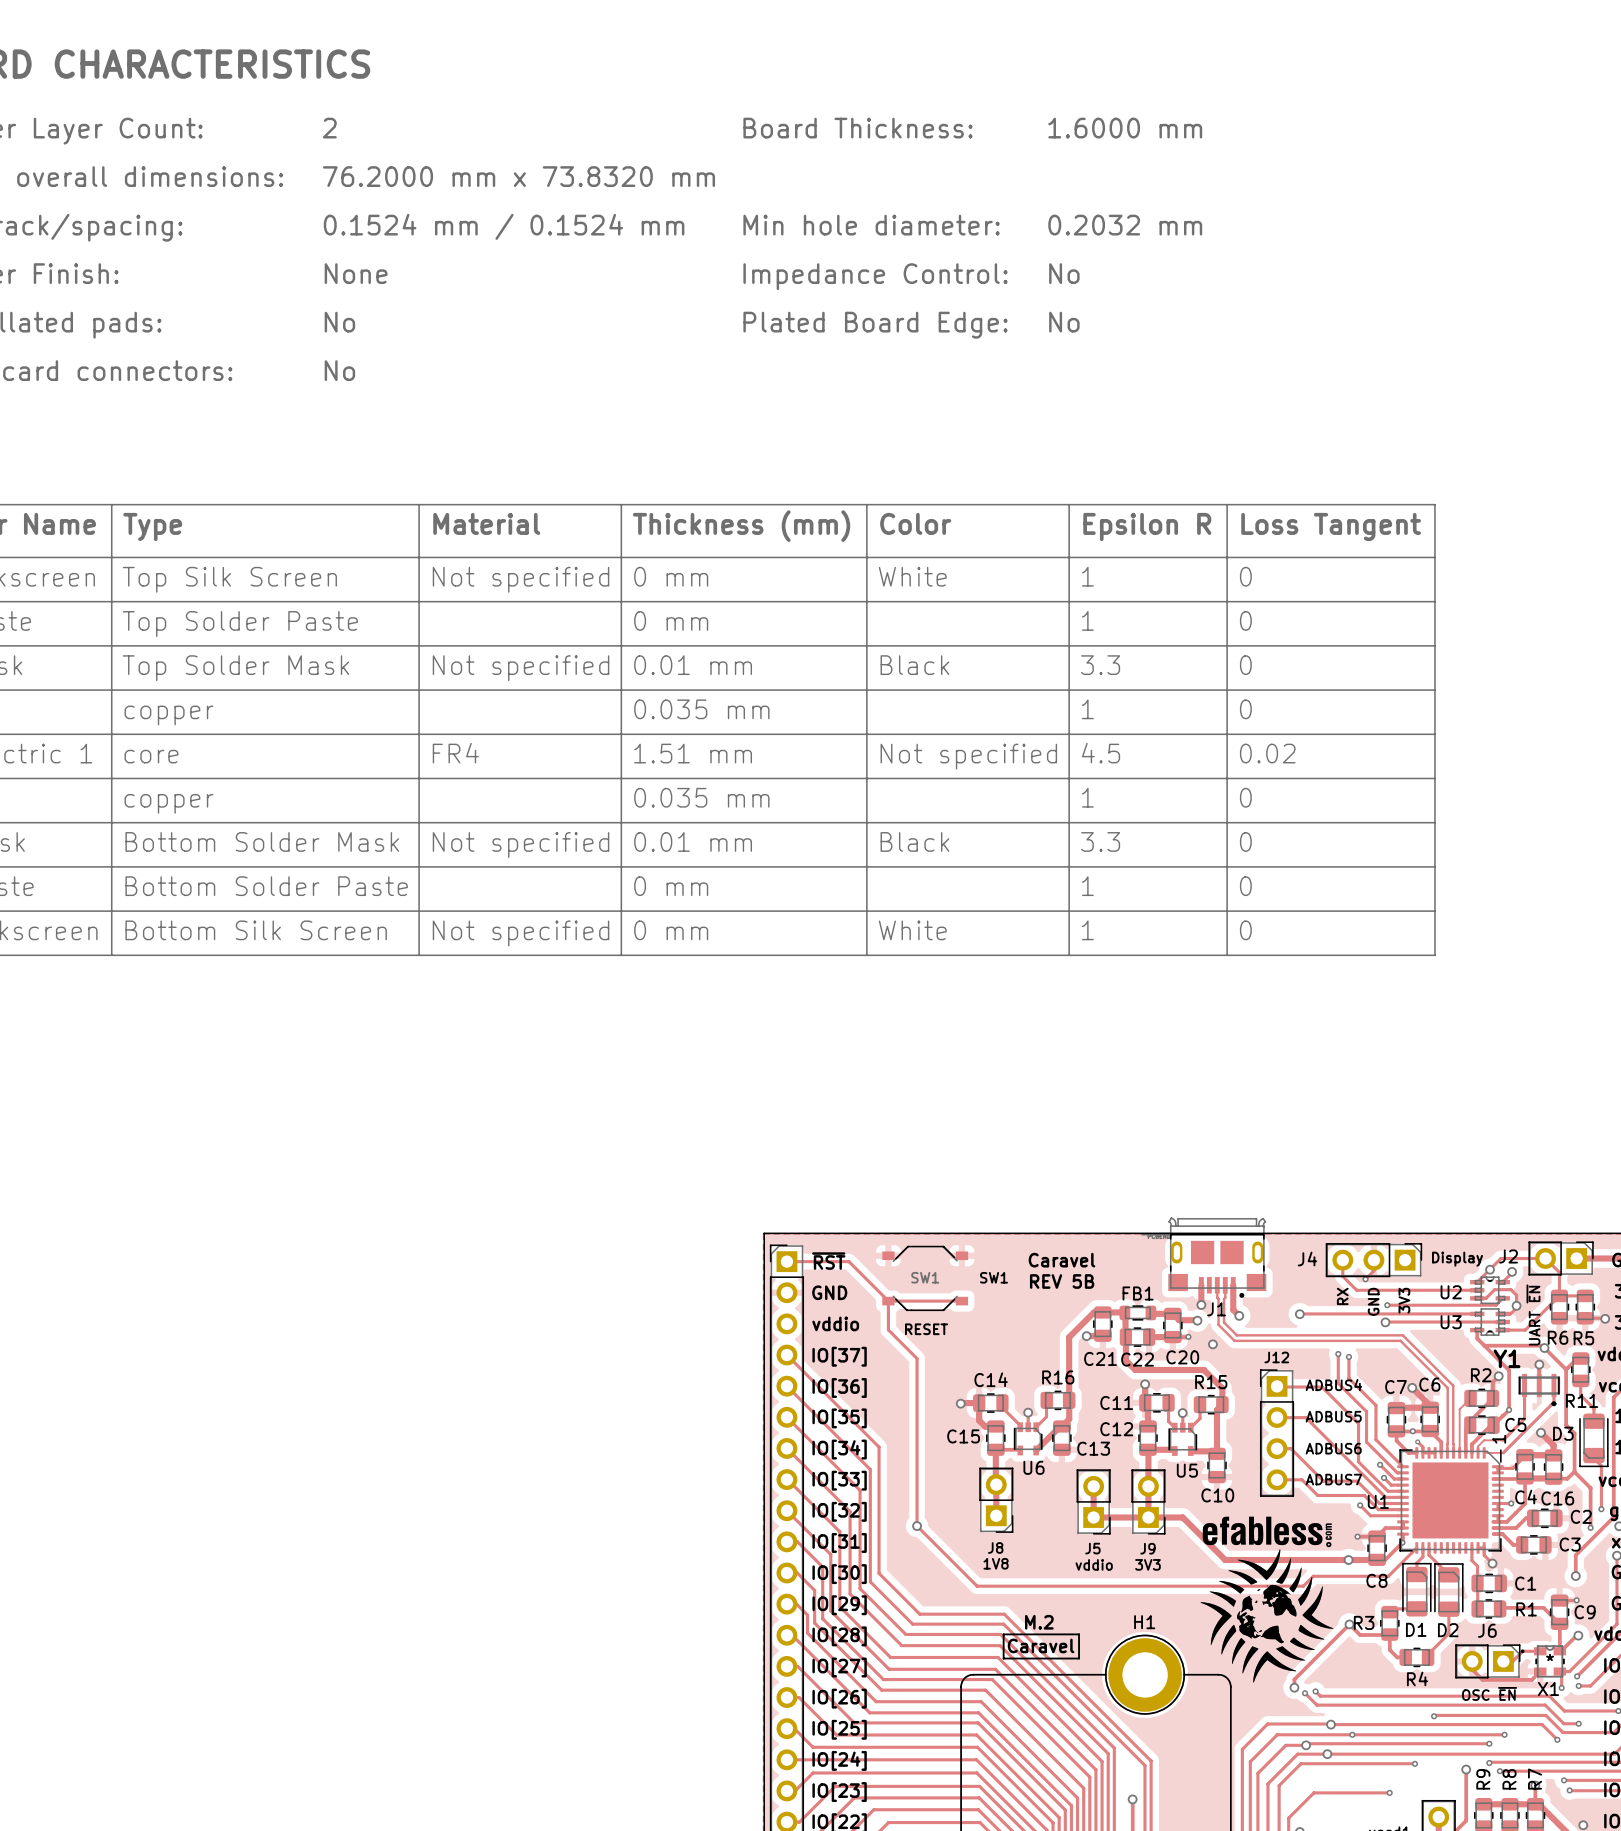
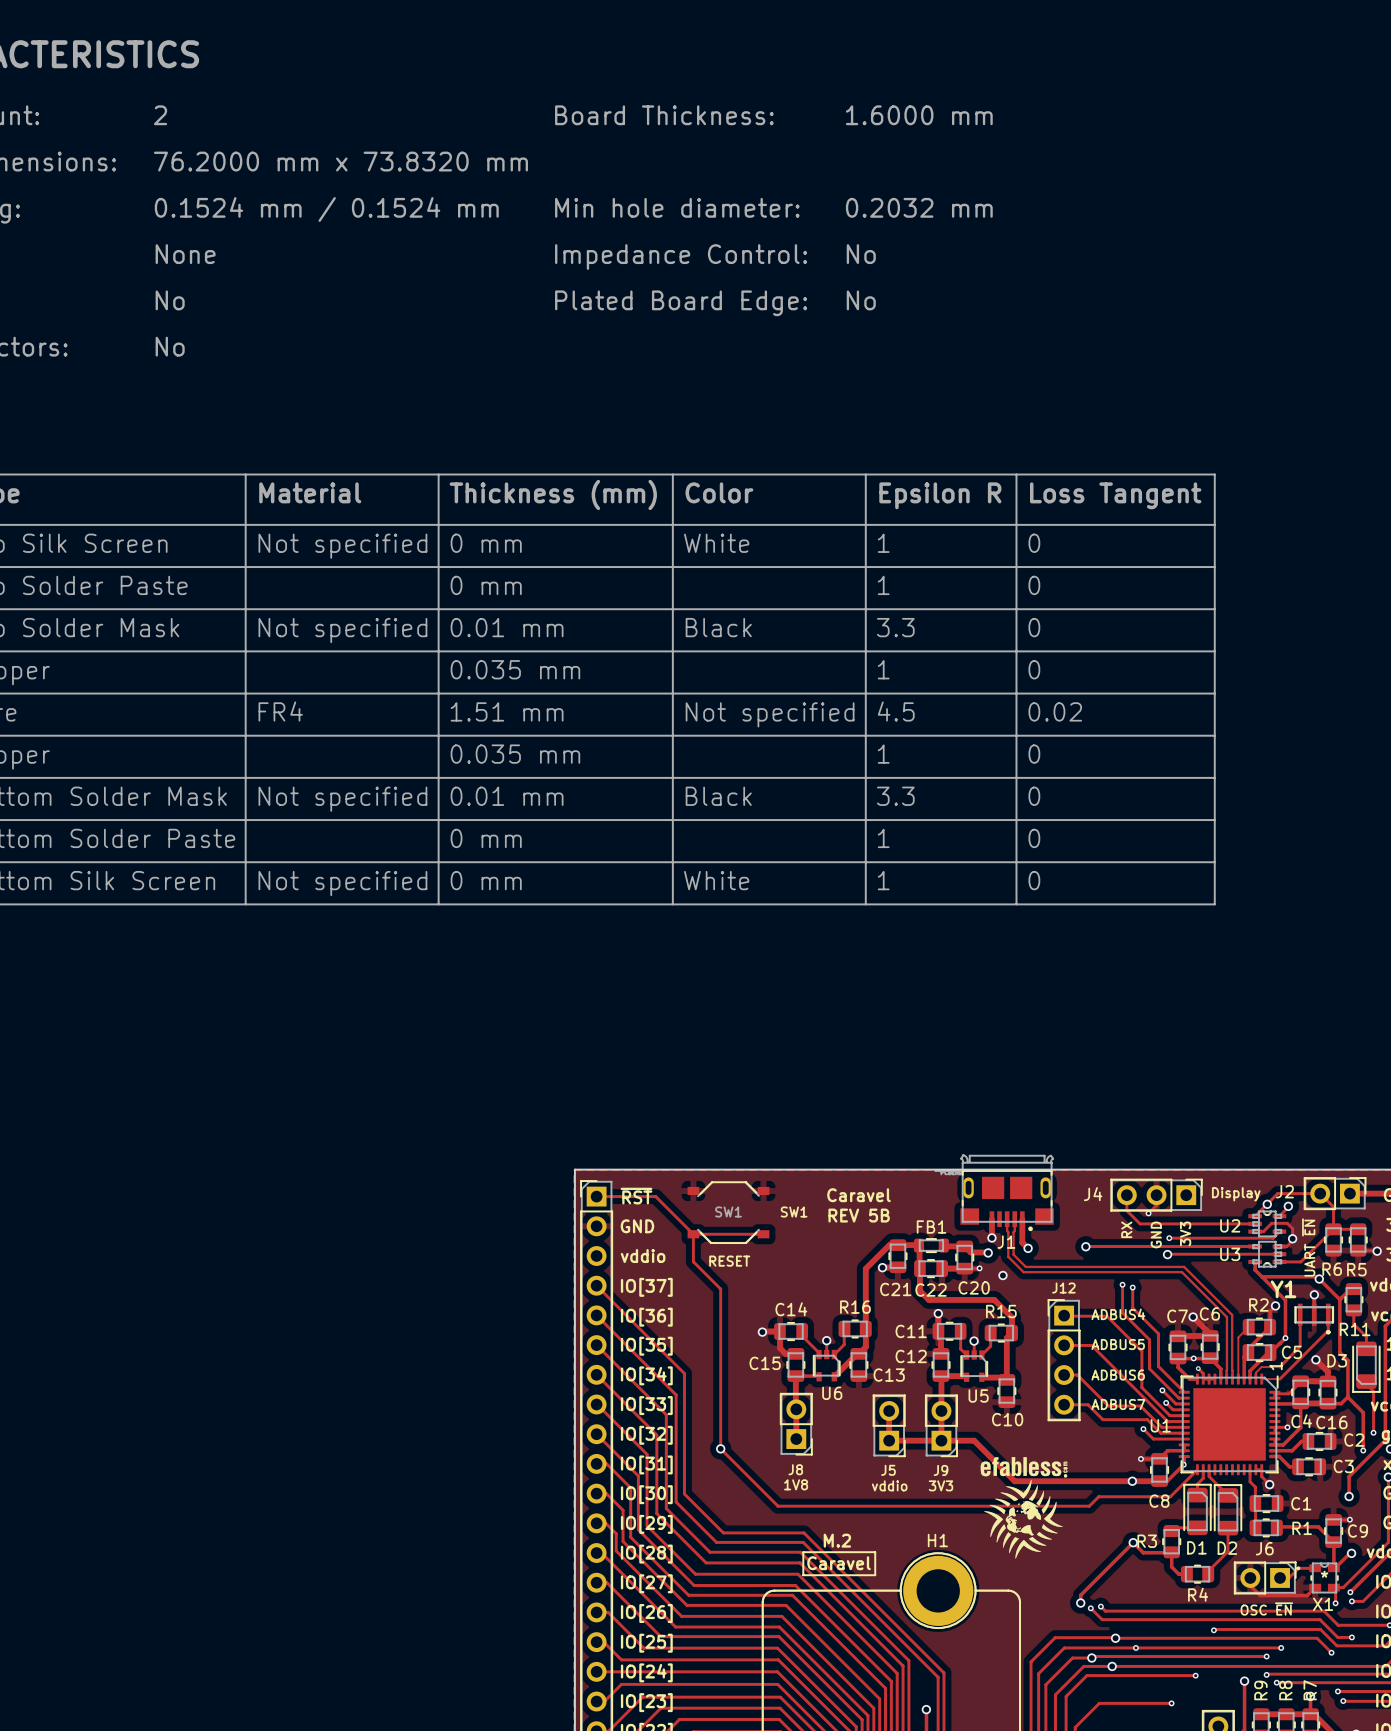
drawing: [1200, 1516, 1334, 1683] -> none
drawing: none -> [980, 1457, 1068, 1559]

